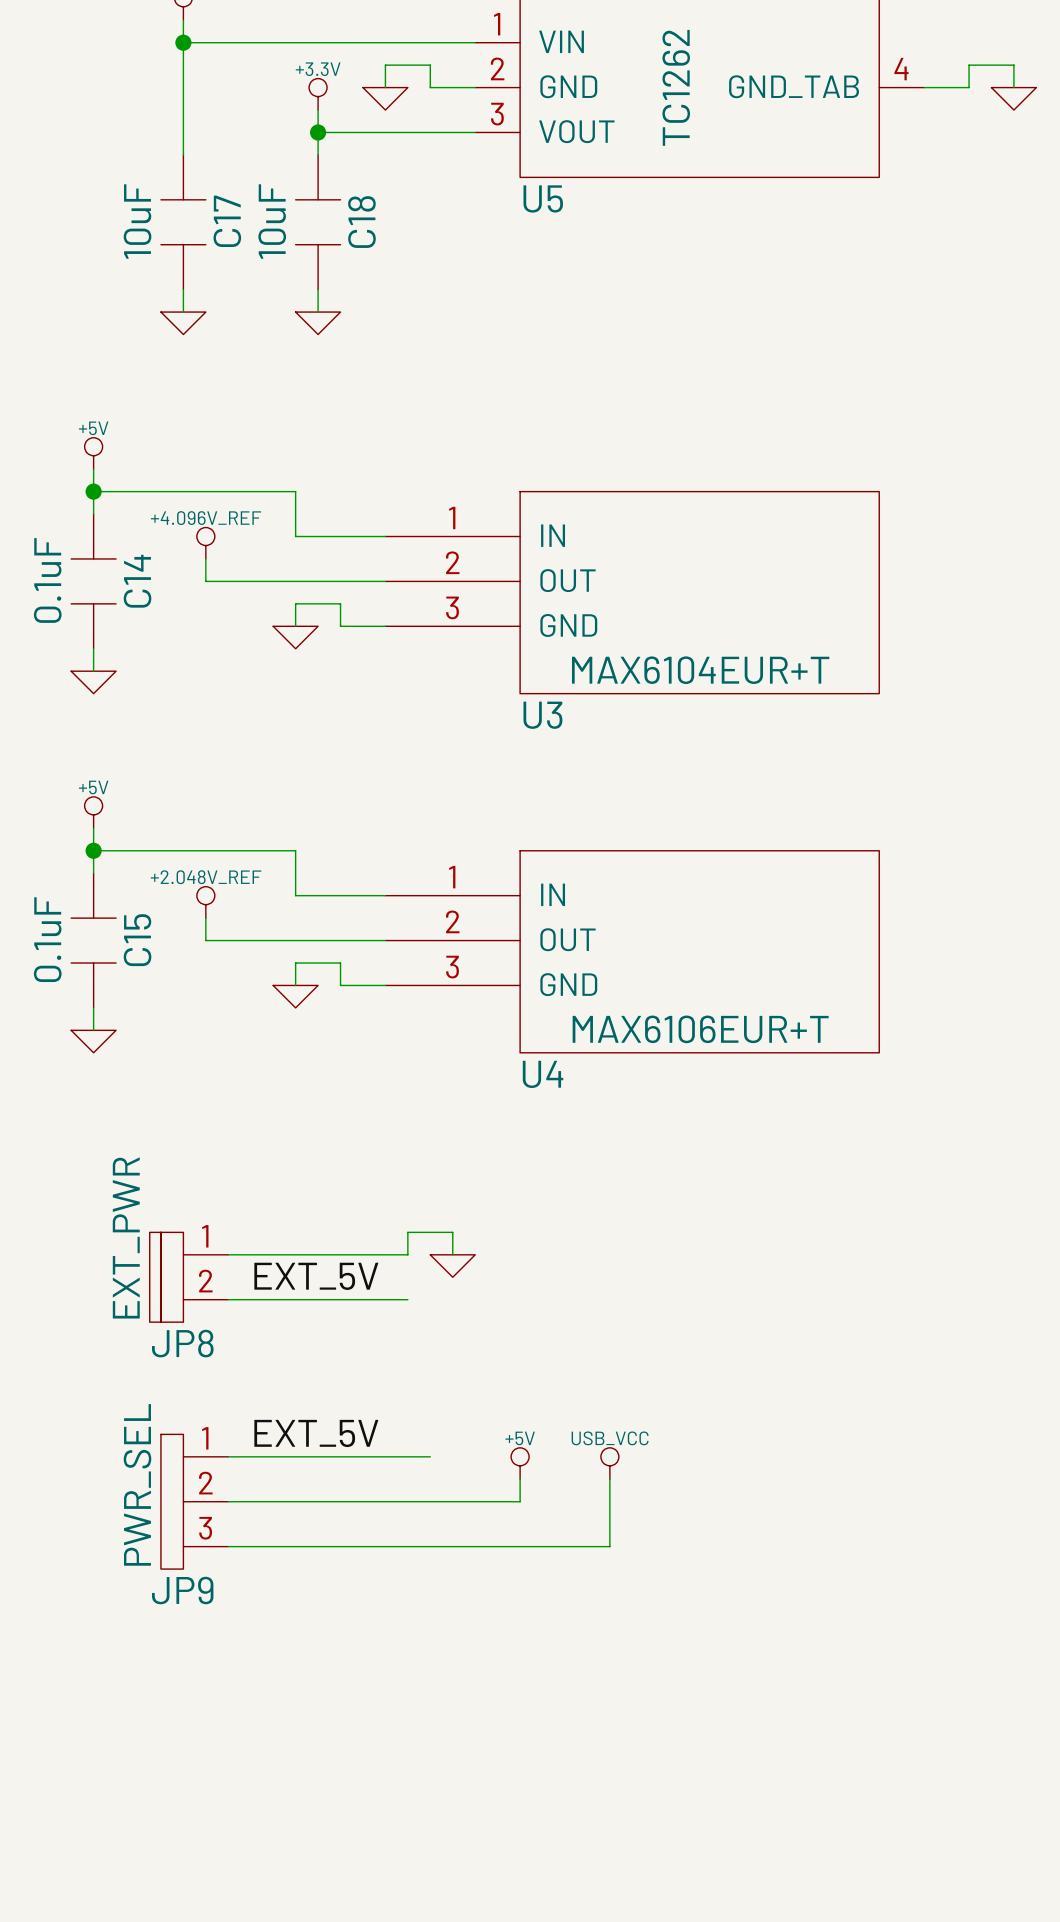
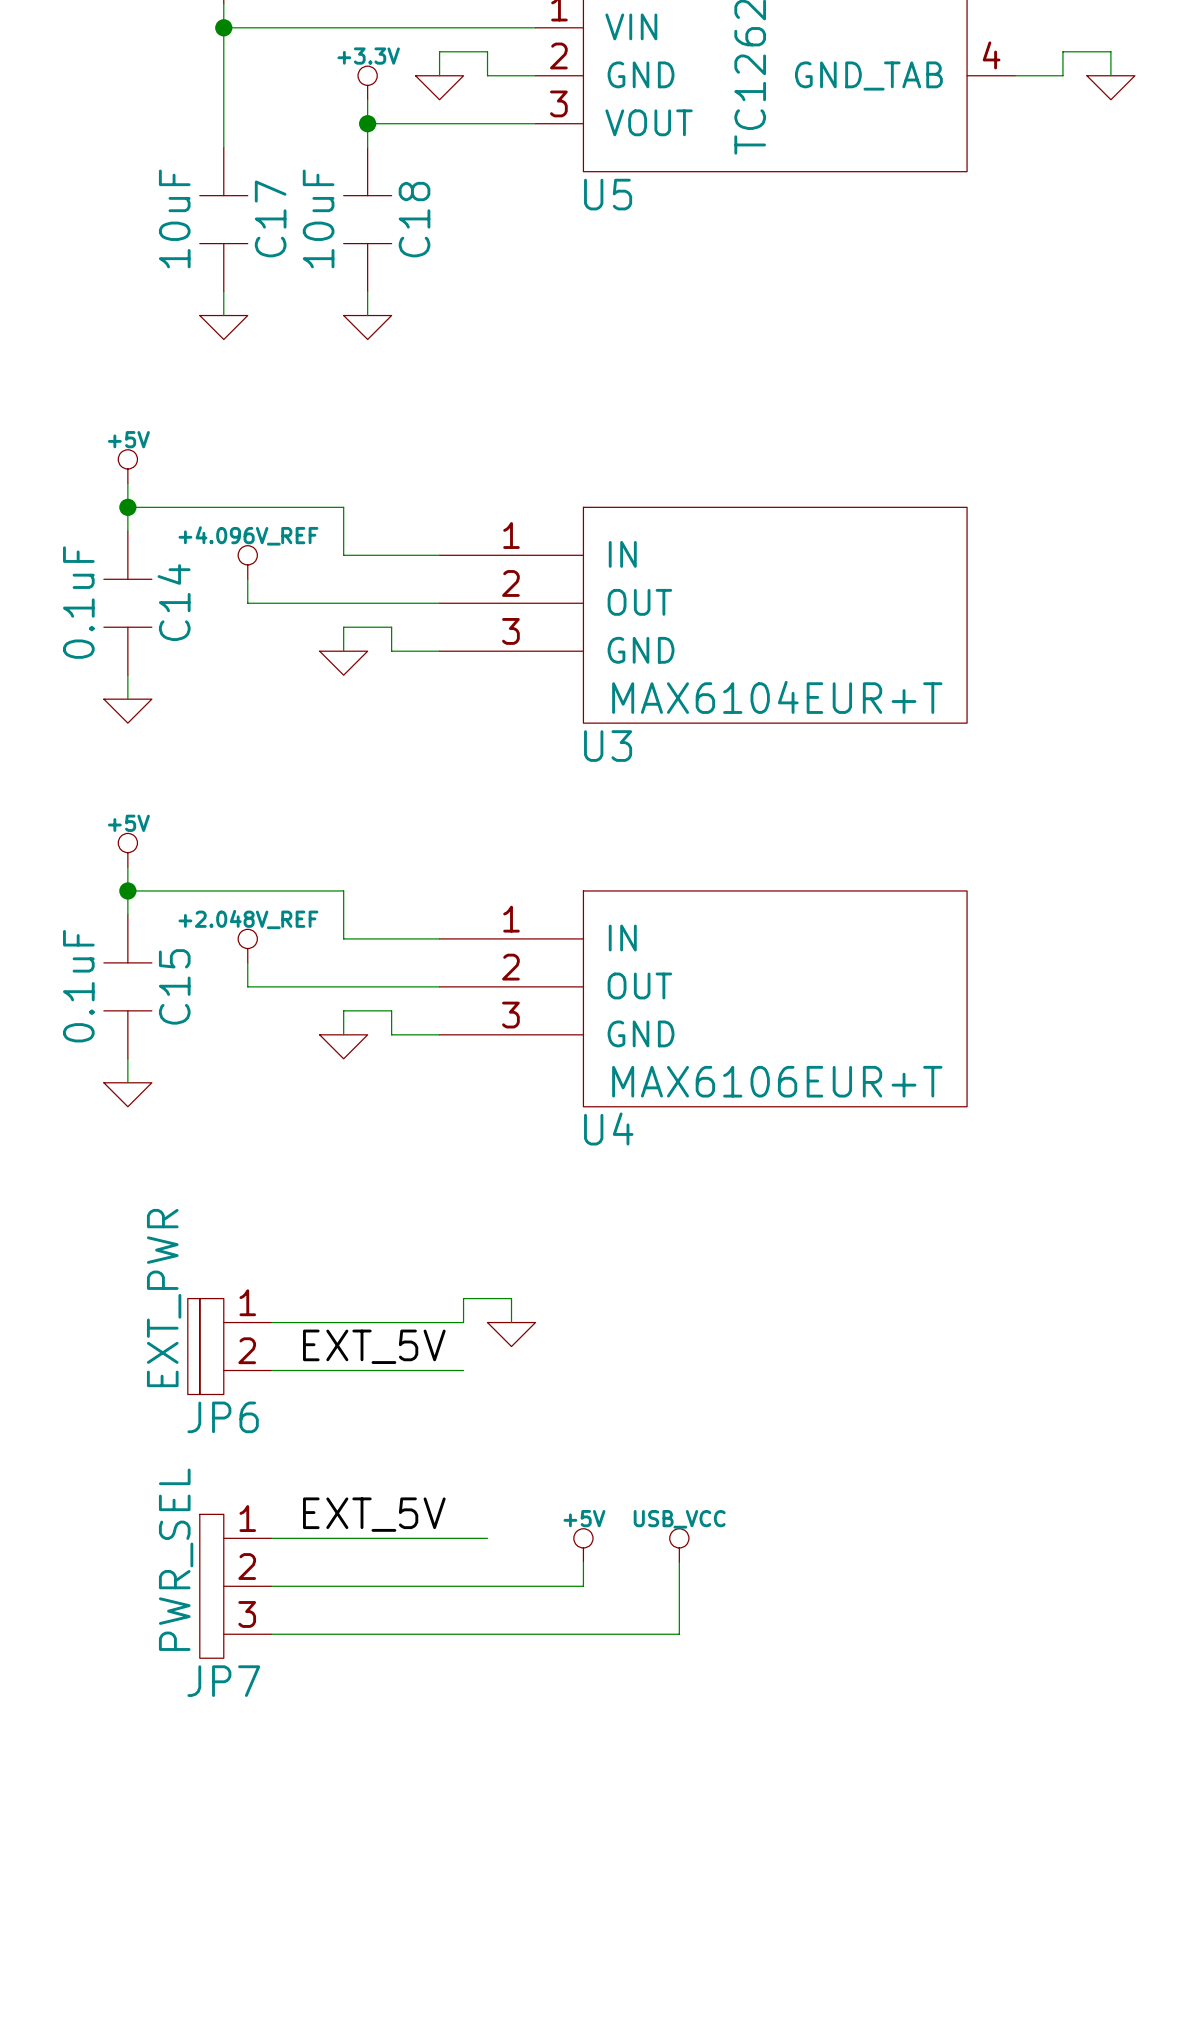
JP8 name: JP8 (182, 1343) -> JP6 (223, 1417)
JP9 name: JP9 (182, 1590) -> JP7 (223, 1681)

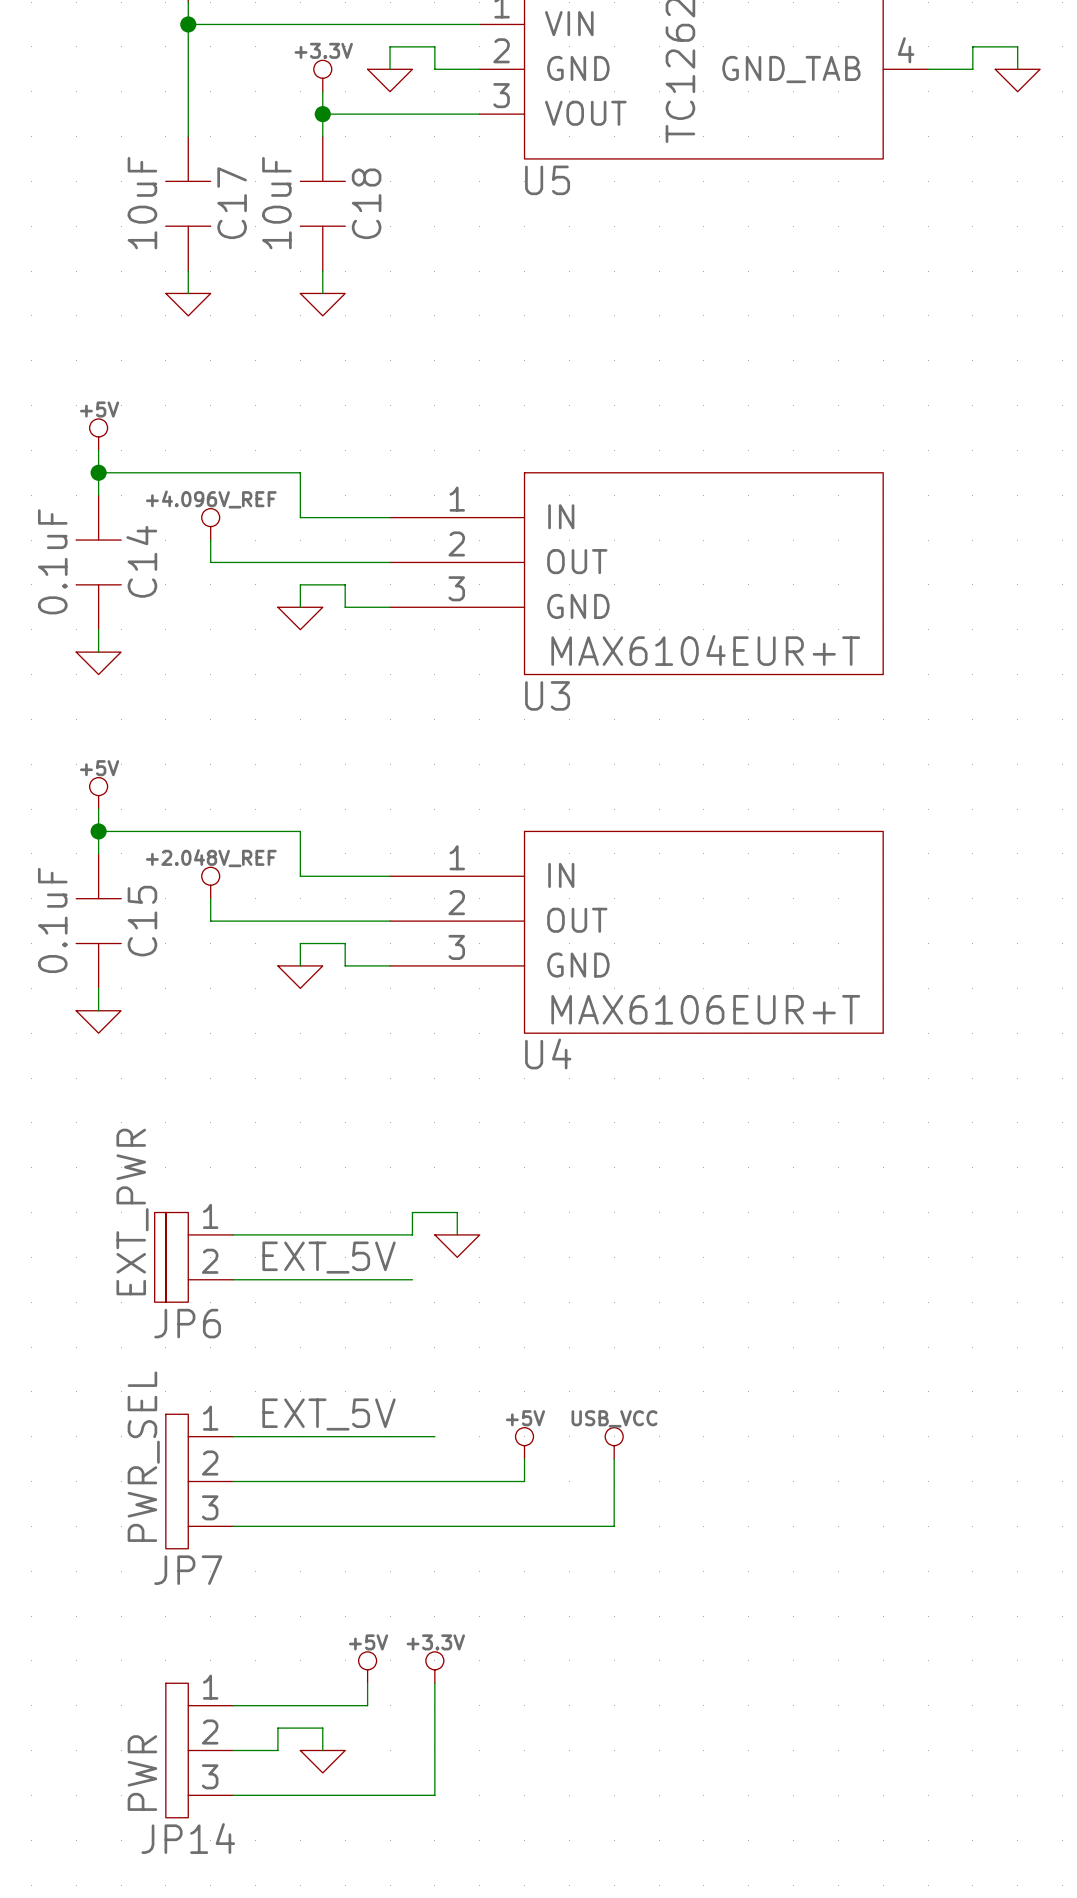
power symbol: none -> +5V (367, 1667)
power symbol: none -> +3.3V (434, 1667)
wire: none -> (367, 1683) (367, 1705) (233, 1705)
wire: none -> (434, 1683) (434, 1795) (233, 1795)
JP14: none -> PWR (199, 1750)
wire: none -> (233, 1750) (277, 1750) (277, 1728) (322, 1728) (322, 1750)
power symbol: none -> (322, 1761)

